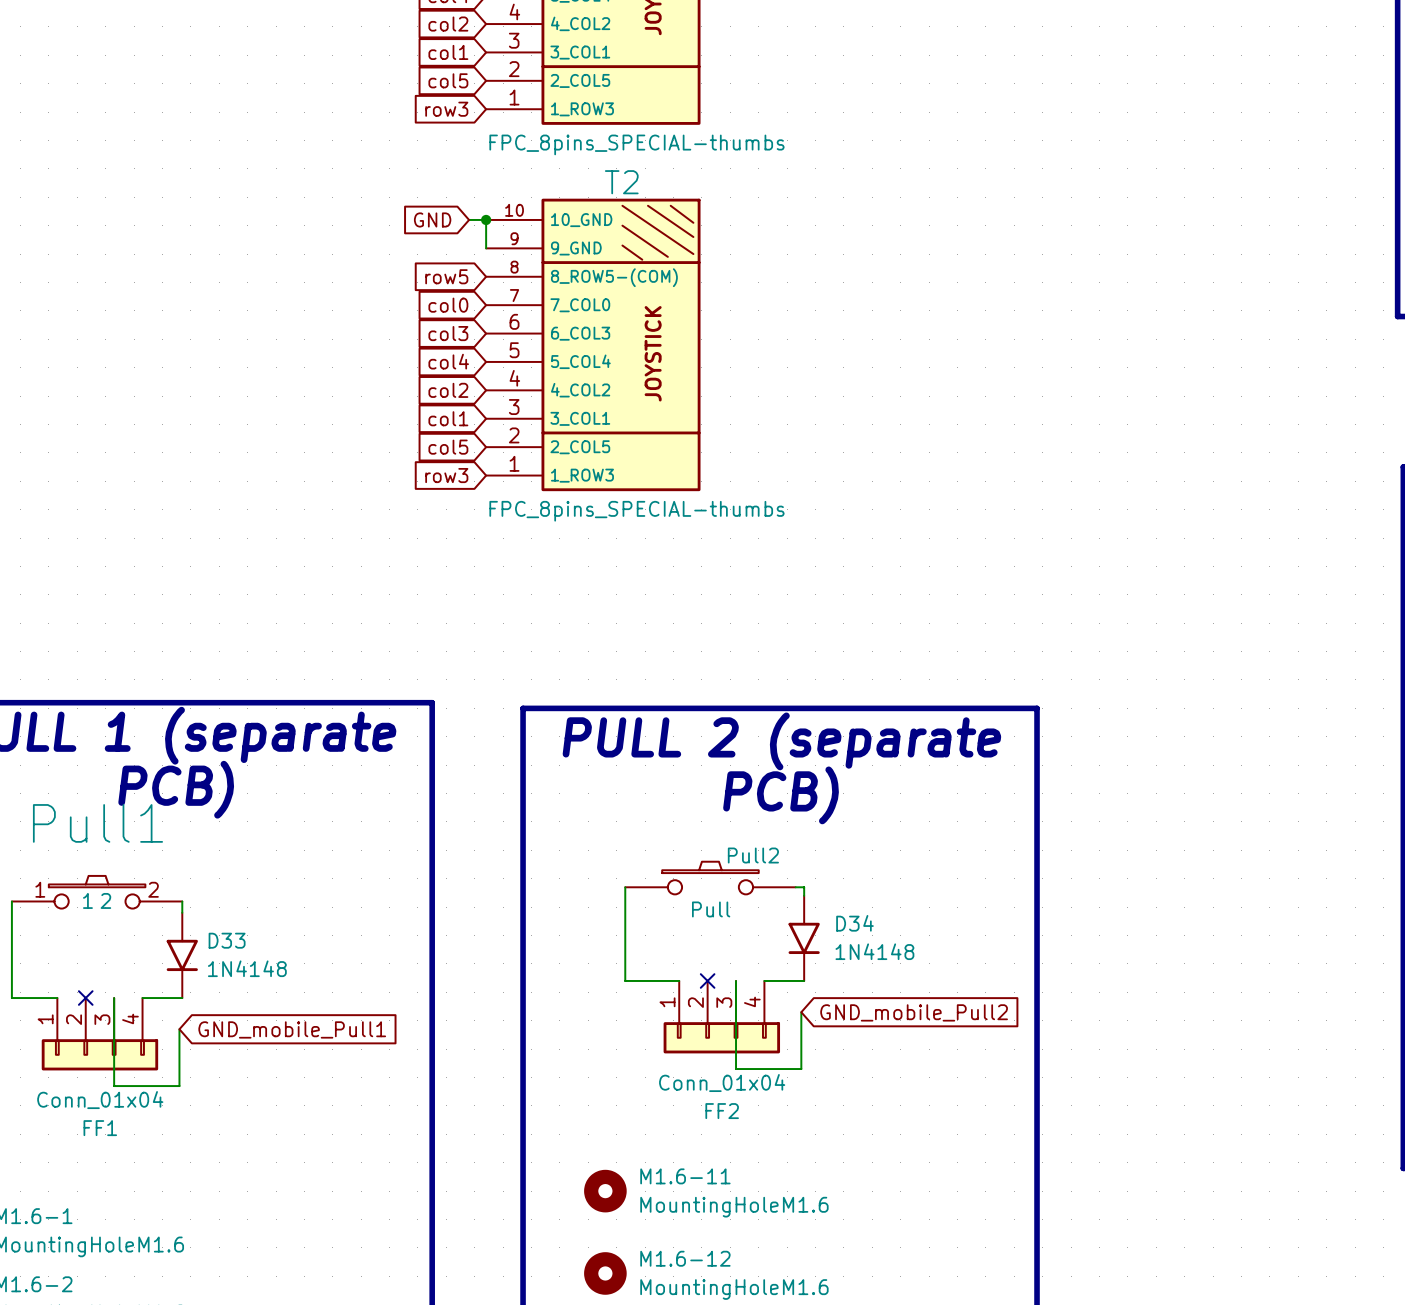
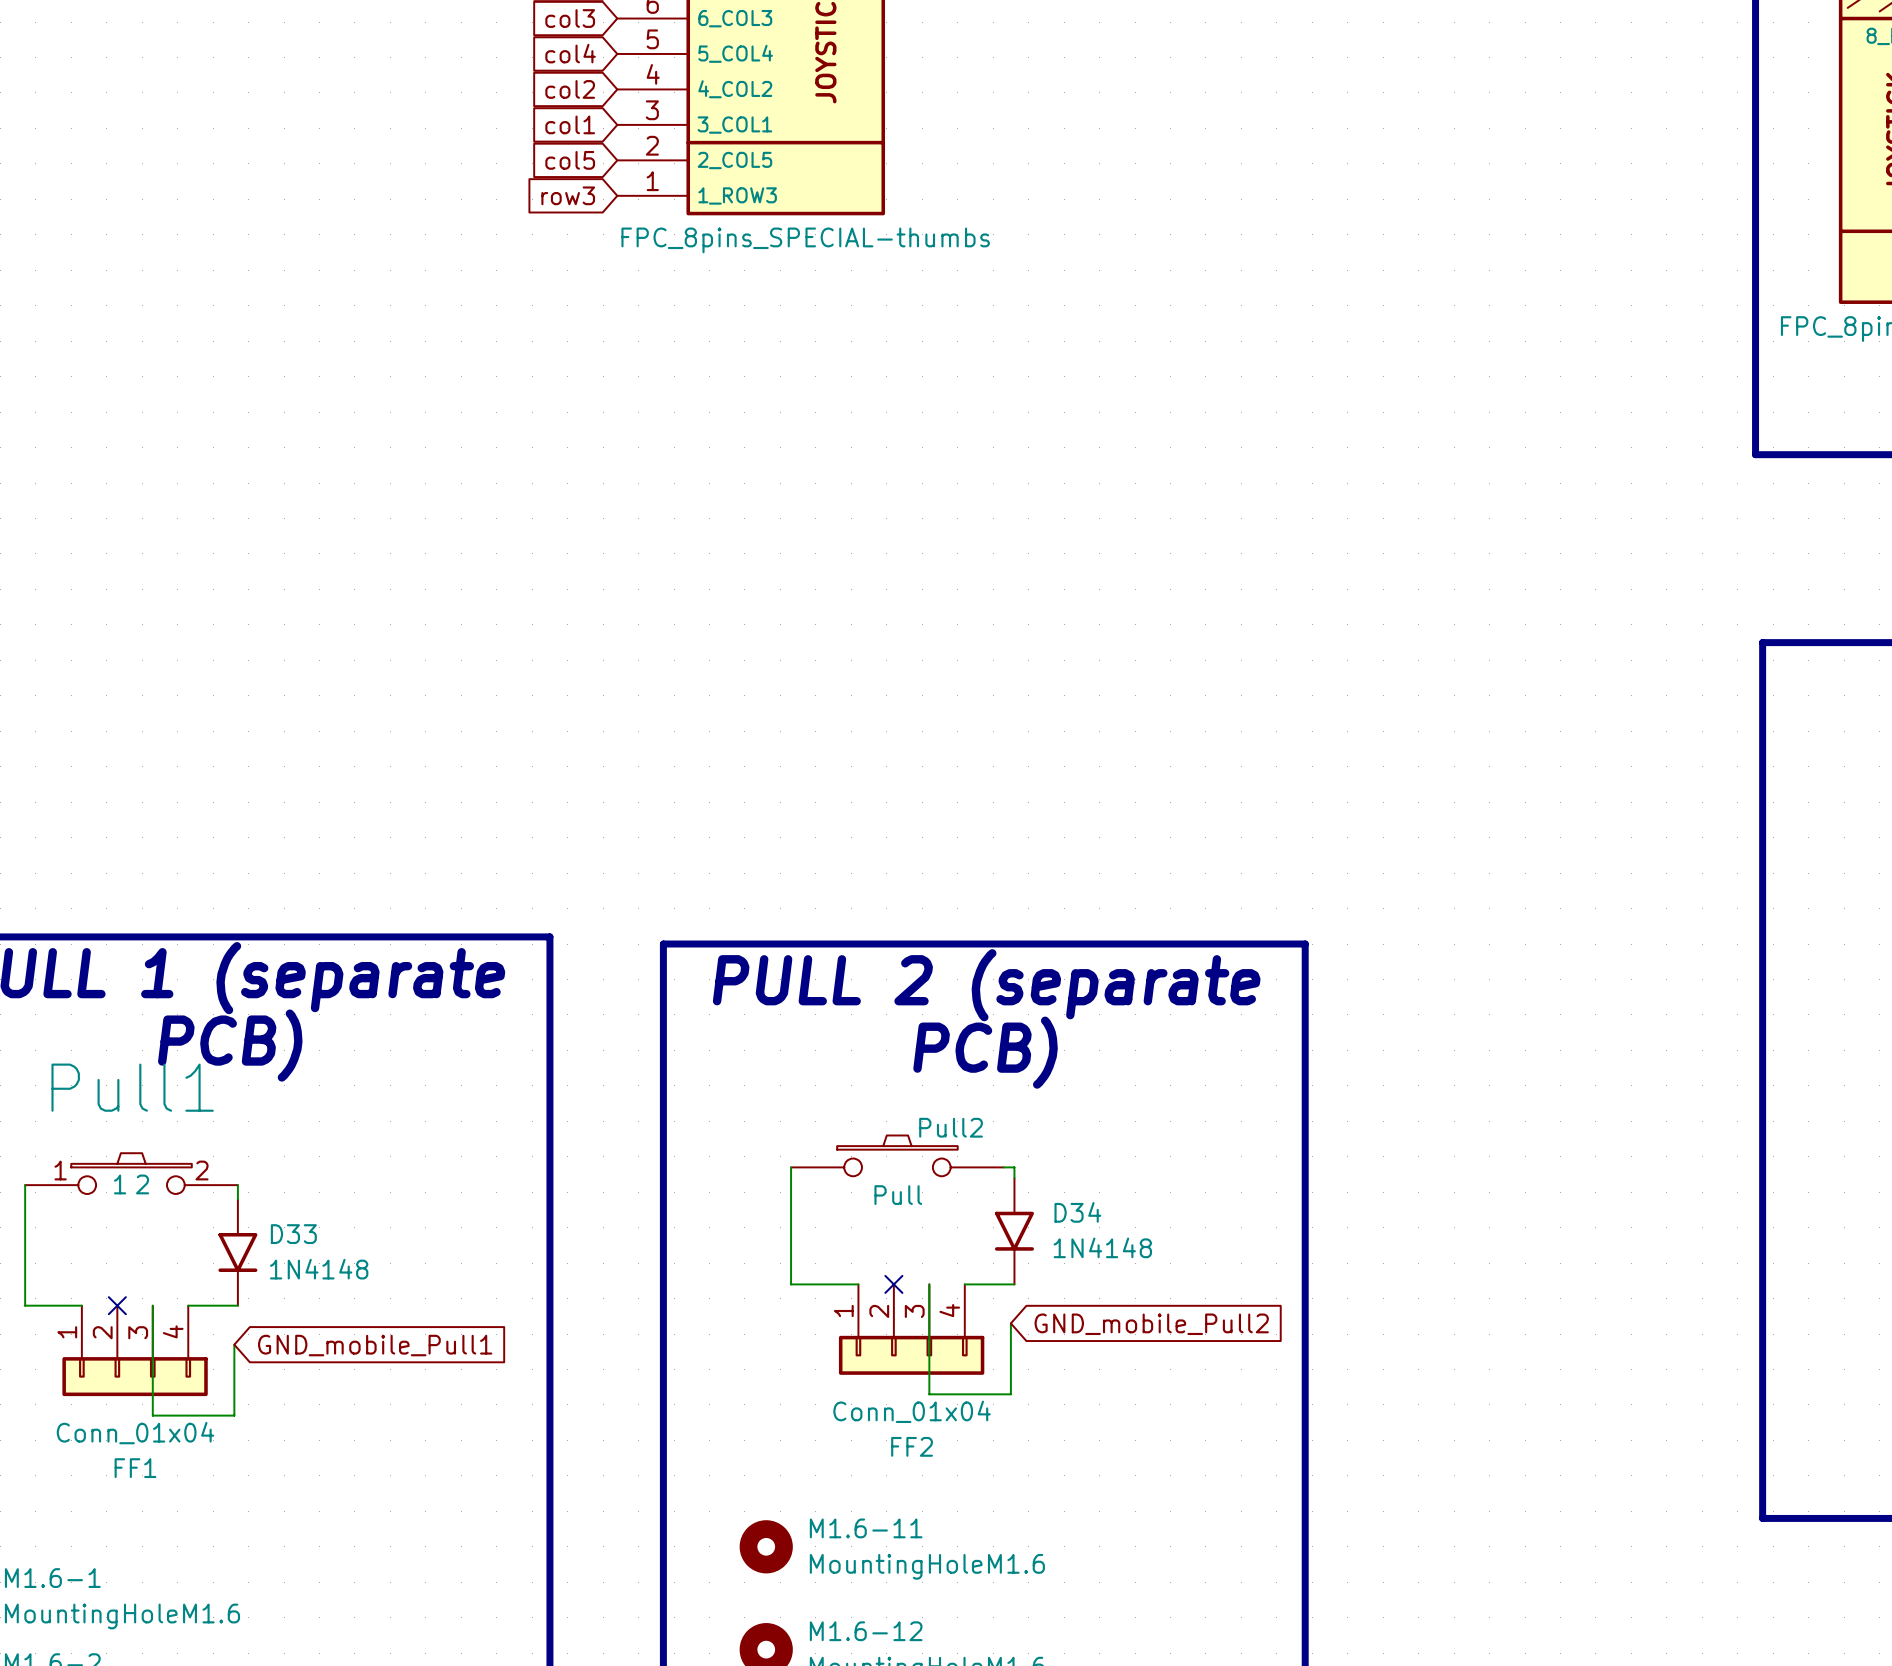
global label: GND (432, 219) -> none
wire: (469, 219) (486, 219) (486, 248) -> none
junction: (486, 219) -> none
global label: row5 (446, 276) -> none
global label: col0 (448, 305) -> none
global label: col3 (448, 333) -> none
T2: FPC_8pins_SPECIAL-thumbs (593, 344) -> none
global label: col4 (448, 361) -> none
global label: col2 (448, 390) -> none
global label: col1 (448, 418) -> none
global label: col5 (448, 447) -> none
global label: row3 (446, 475) -> none

